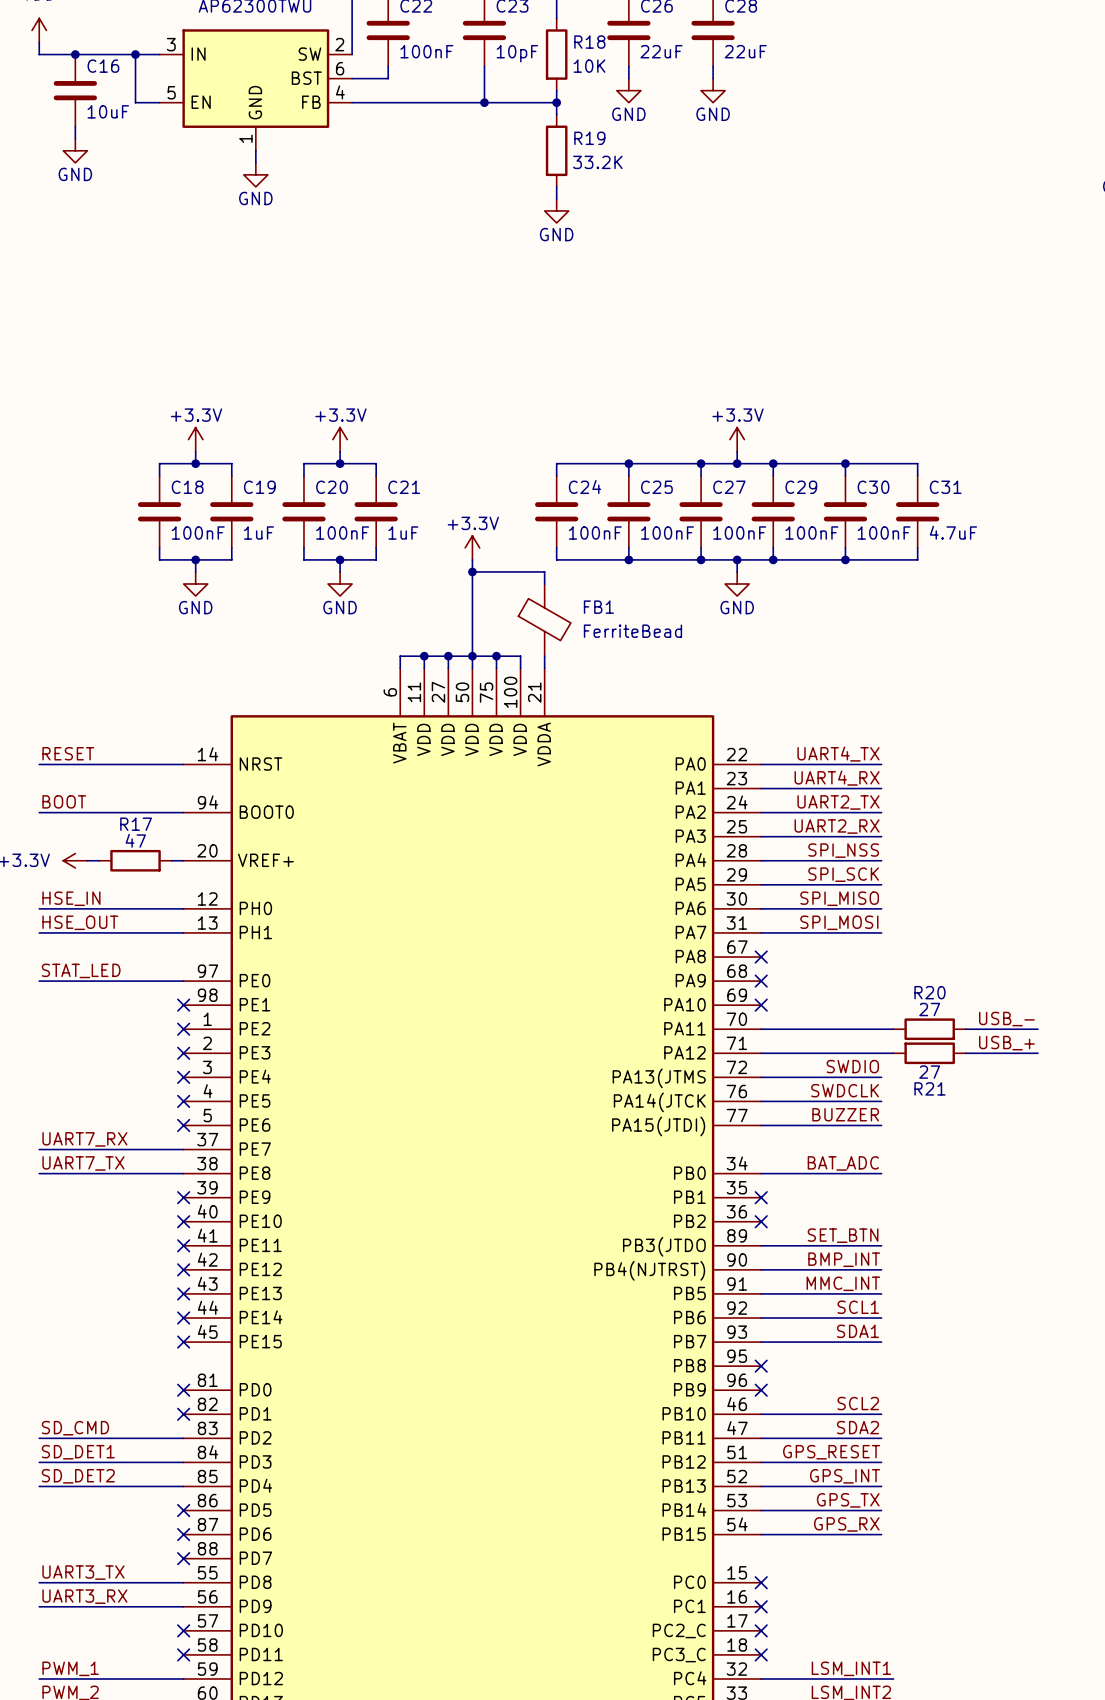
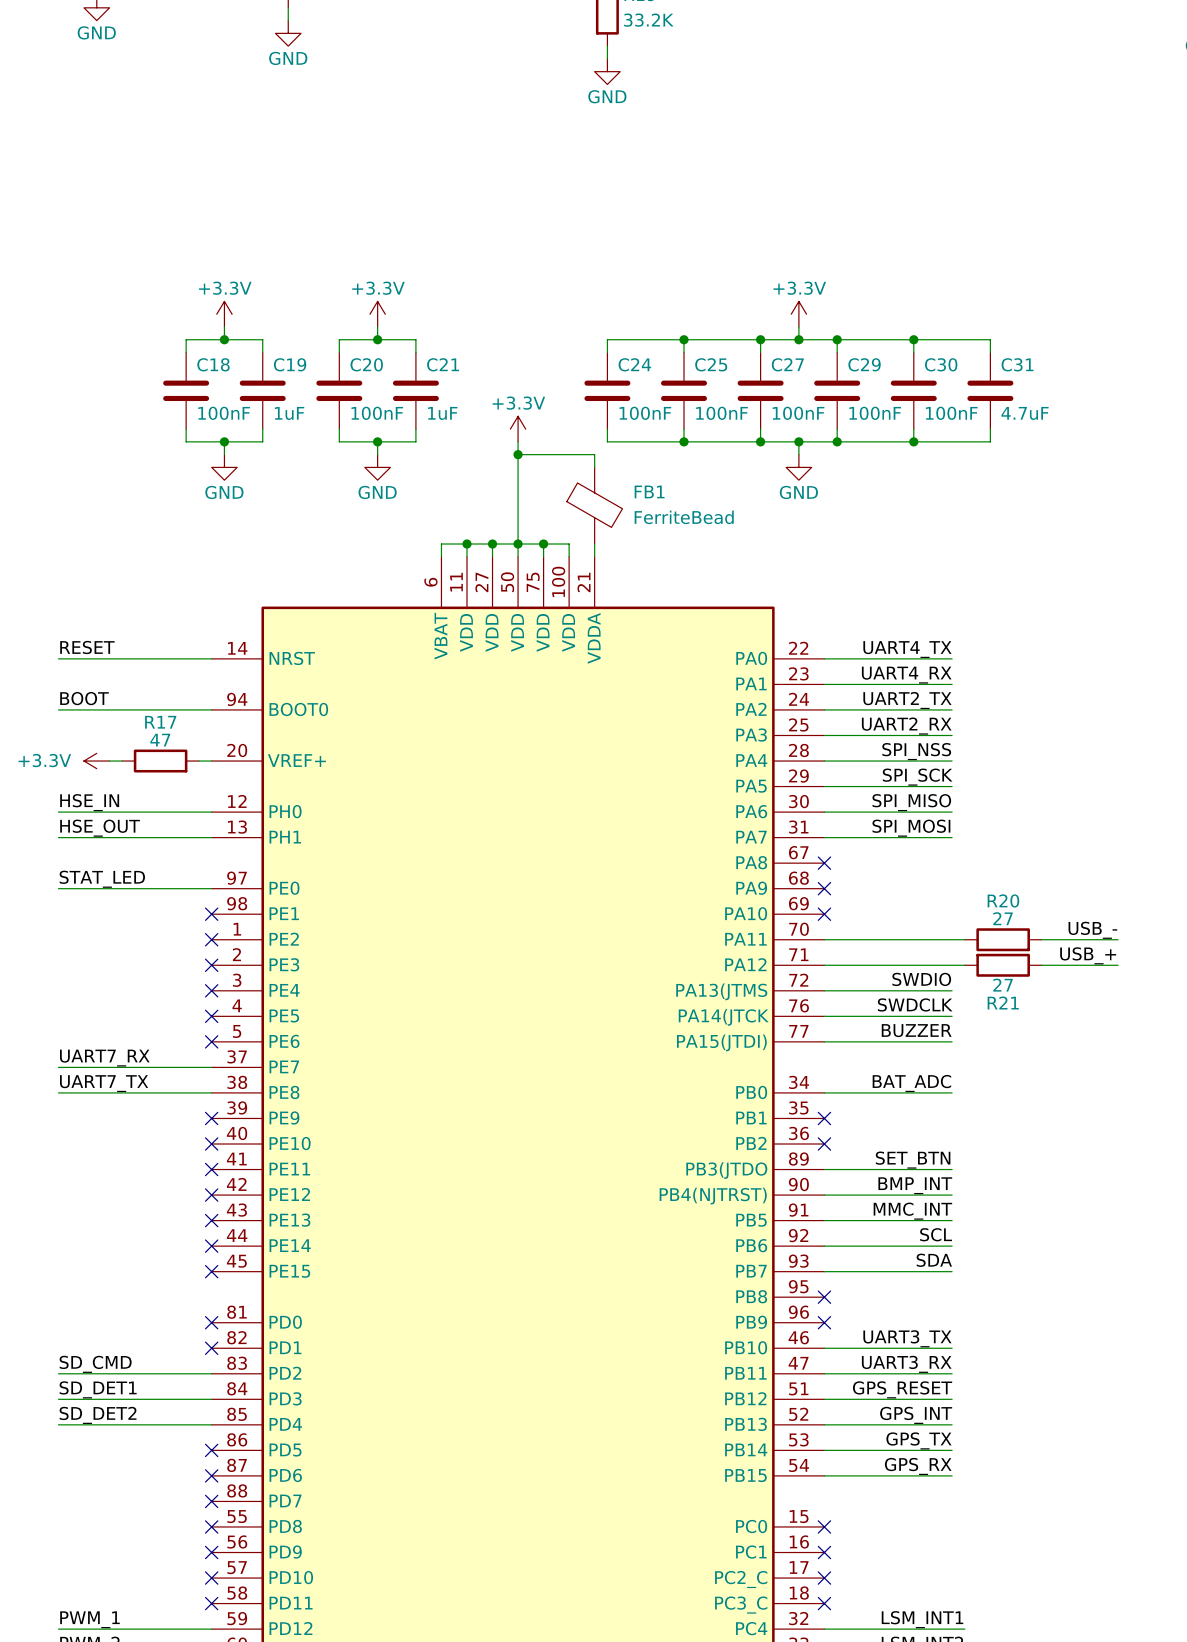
label: SCL1 (858, 1307) -> SCL (936, 1234)
label: SDA1 (857, 1331) -> SDA (934, 1260)
label: SCL2 (858, 1403) -> UART3_TX (907, 1338)
label: SDA2 (857, 1427) -> UART3_RX (906, 1364)
label: UART3_TX (83, 1572) -> none
wire: (39, 1582) (183, 1582) -> none
no-connect mark: none -> (211, 1526)
label: UART3_RX (84, 1596) -> none
wire: (39, 1606) (183, 1606) -> none
no-connect mark: none -> (211, 1552)

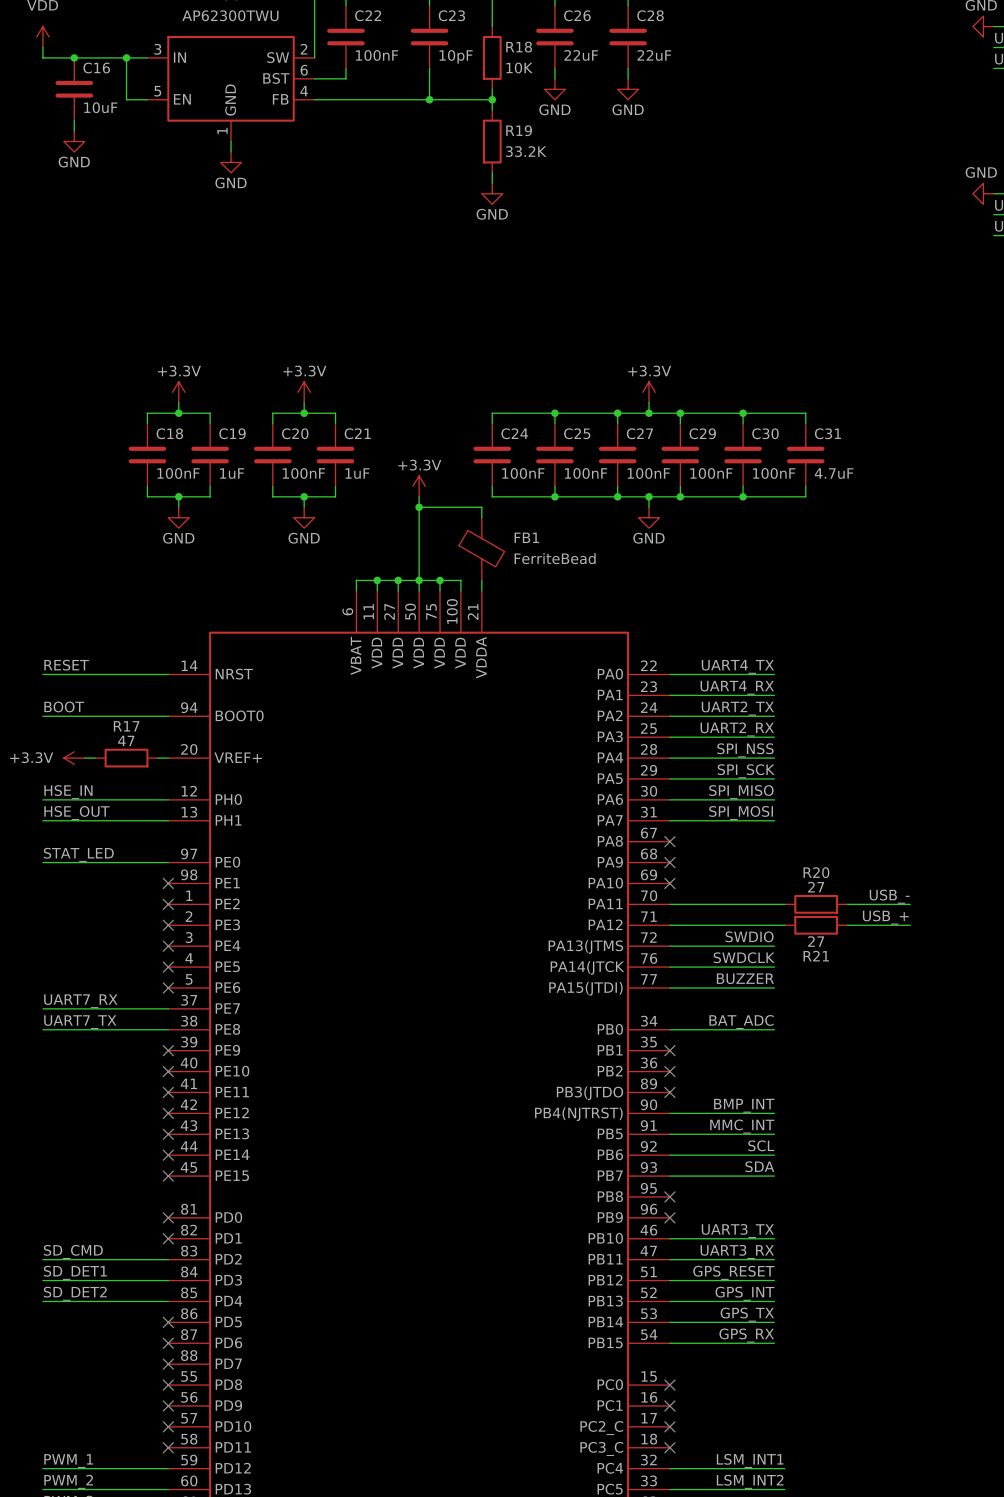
label: SET_BTN (913, 1160) -> none
wire: (824, 1169) (952, 1169) -> none
no-connect mark: none -> (669, 1092)

